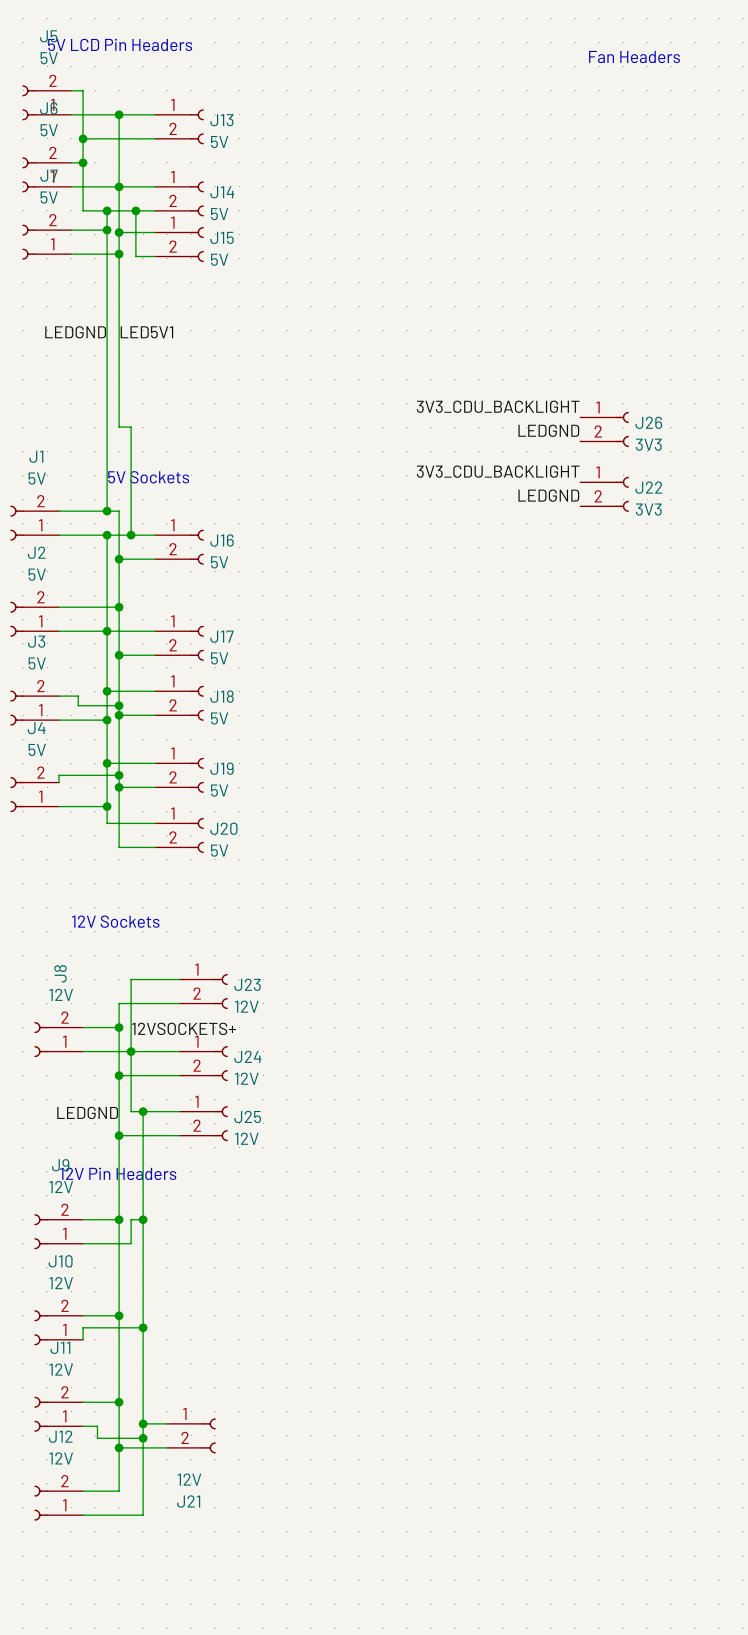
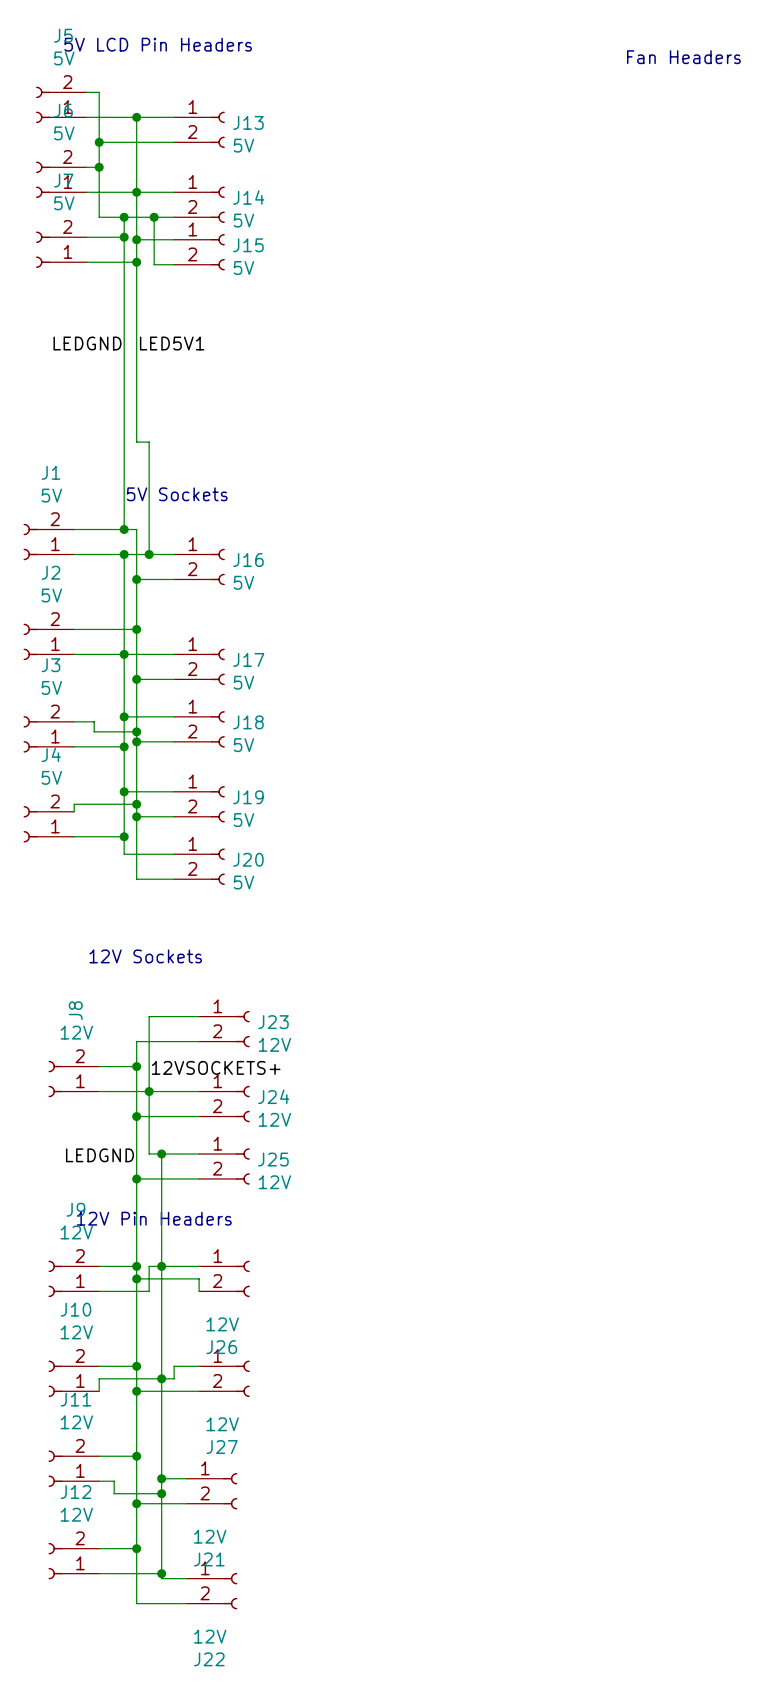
label: 3V3_CDU_BACKLIGHT (498, 406) -> none
J26 name position: J26 (648, 422) -> J26 (221, 1347)
J26 position: (604, 429) -> (224, 1278)
label: LEDGND (548, 430) -> none
J26 value: 3V3 (648, 444) -> 12V (222, 1324)
label: 3V3_CDU_BACKLIGHT (498, 471) -> none
J22 name position: J22 (648, 487) -> J22 (209, 1659)
J22 position: (604, 494) -> (211, 1591)
label: LEDGND (548, 495) -> none
J22 value: 3V3 (648, 509) -> 12V (210, 1636)
wire: none -> (161, 1266) (199, 1266)
wire: none -> (136, 1278) (199, 1278) (199, 1291)
junction: none -> (136, 1278)
wire: none -> (199, 1366) (174, 1366) (174, 1378) (161, 1378)
J27: none -> 12V (224, 1378)
wire: none -> (136, 1391) (199, 1391)
junction: none -> (136, 1391)
wire: none -> (136, 1548) (136, 1603) (186, 1603)
junction: none -> (136, 1548)
wire: none -> (161, 1573) (161, 1578) (186, 1578)
junction: none -> (161, 1573)

